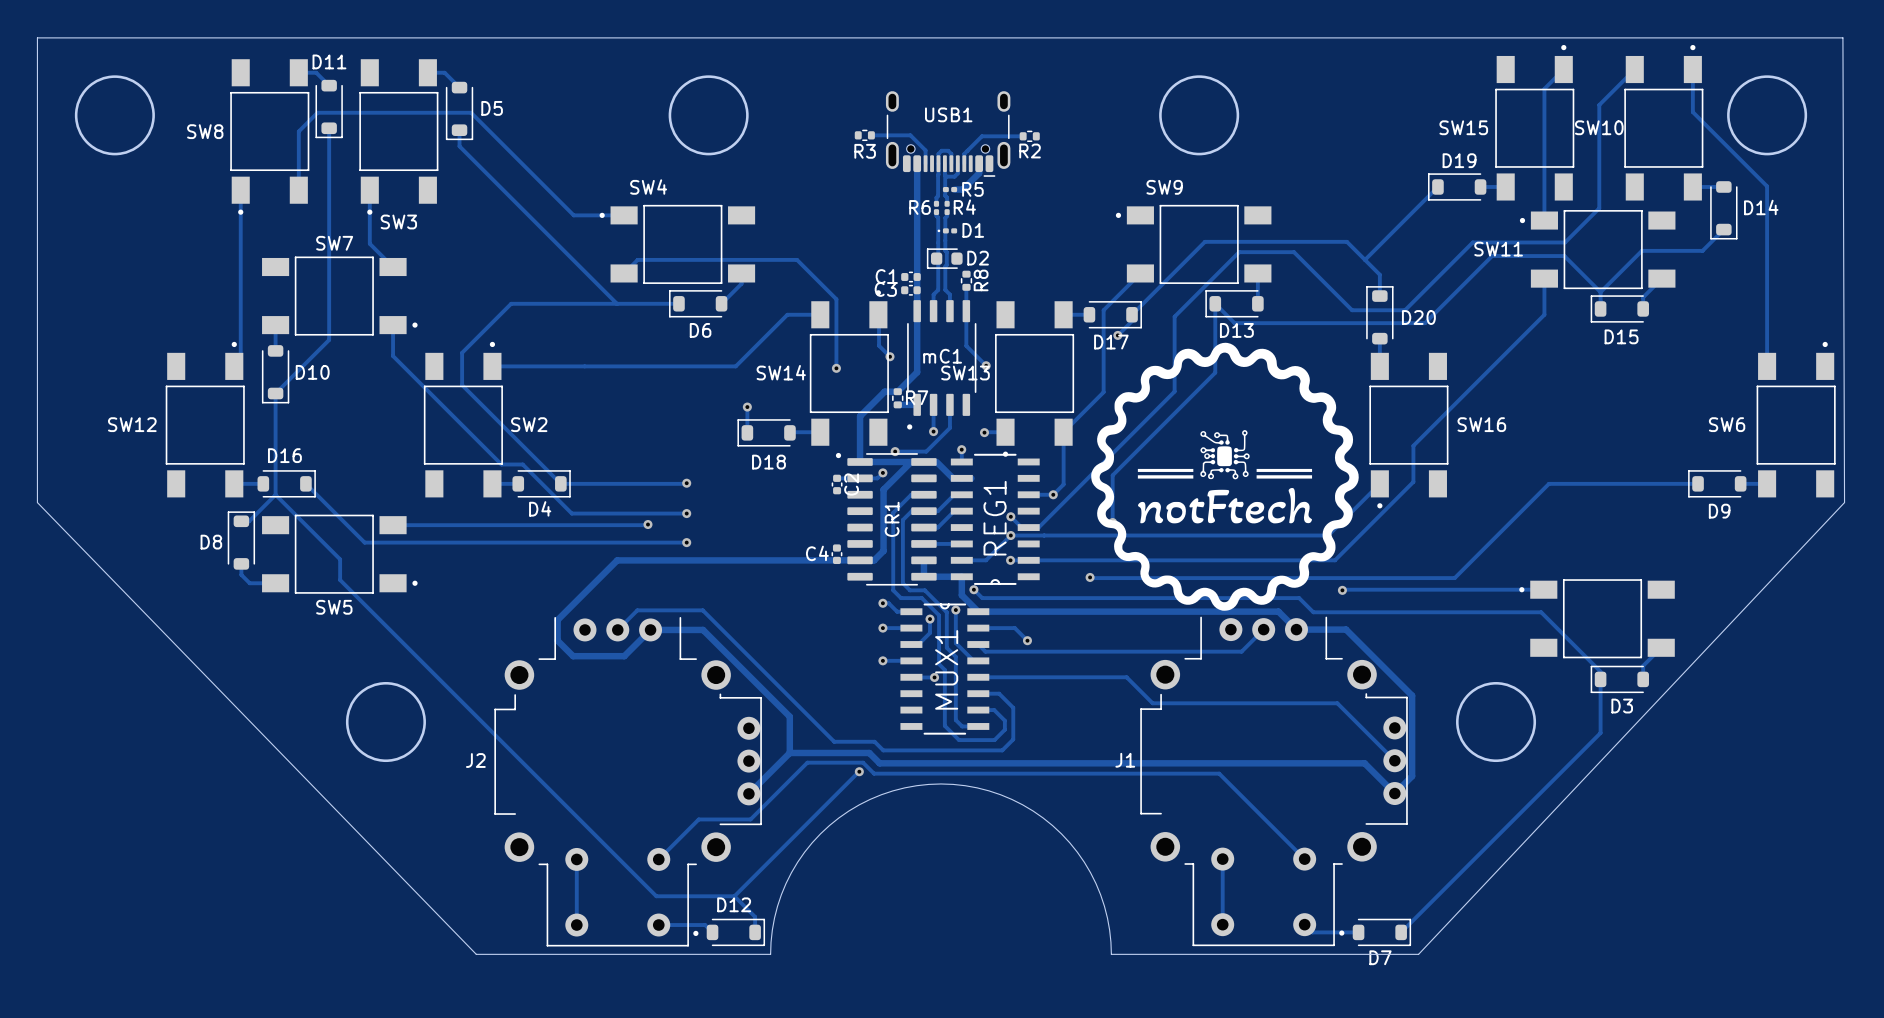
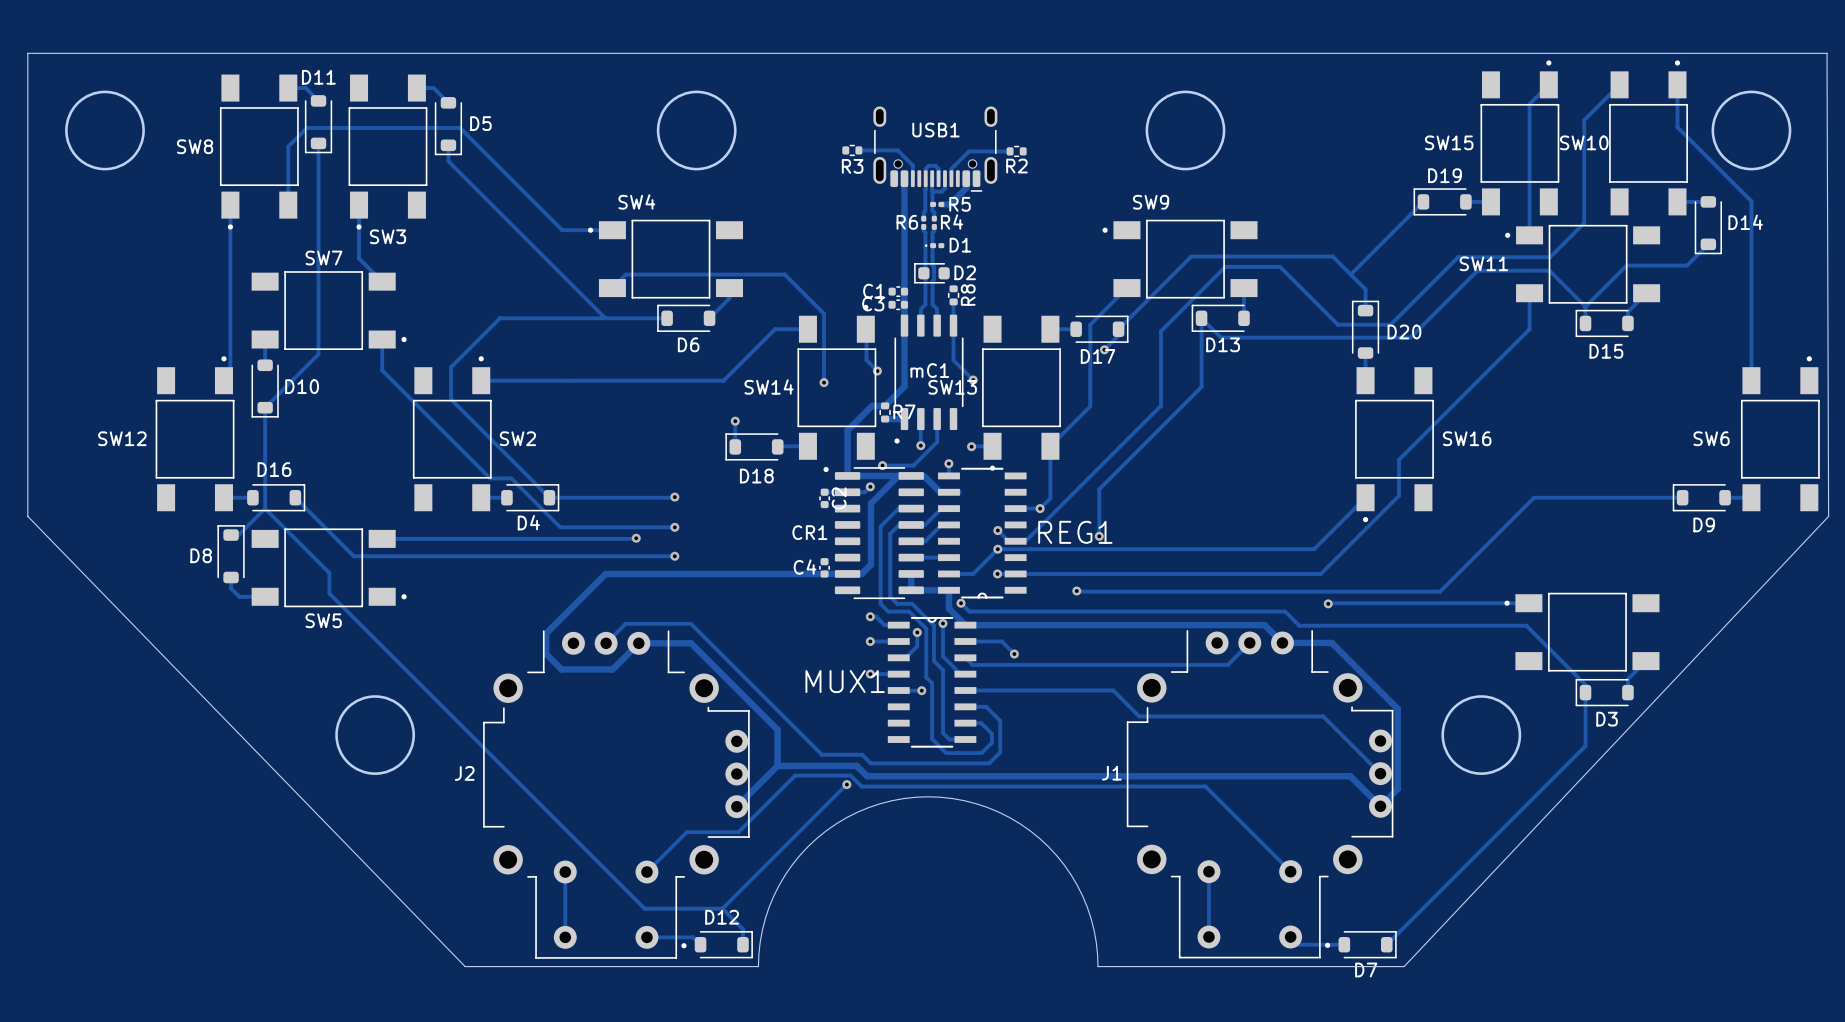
drawing: [1091, 342, 1359, 611] -> none
REG1 name rotation: 0° (995, 518) -> 90° clockwise (1075, 532)
CR1 name rotation: 0° (892, 519) -> 90° clockwise (809, 532)
CR1 name position: CR1 (892, 519) -> CR1 (809, 532)
MUX1 name rotation: 0° (946, 669) -> 90° clockwise (845, 681)

